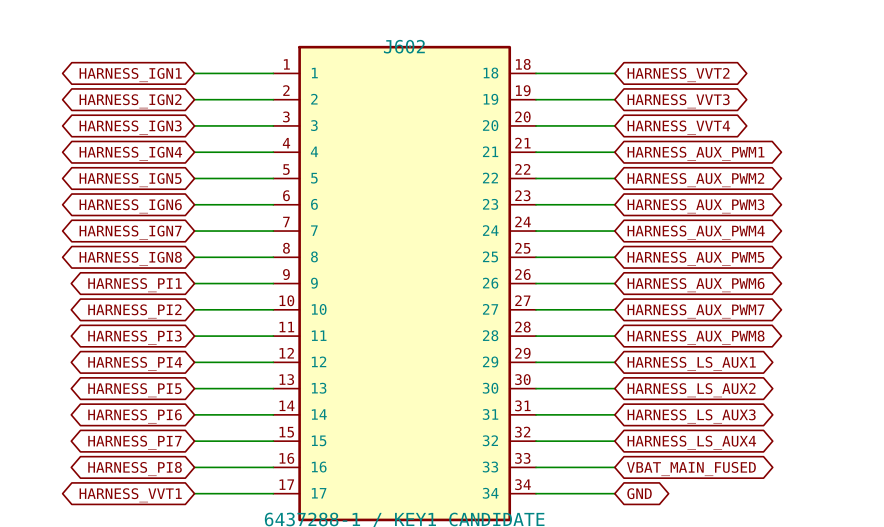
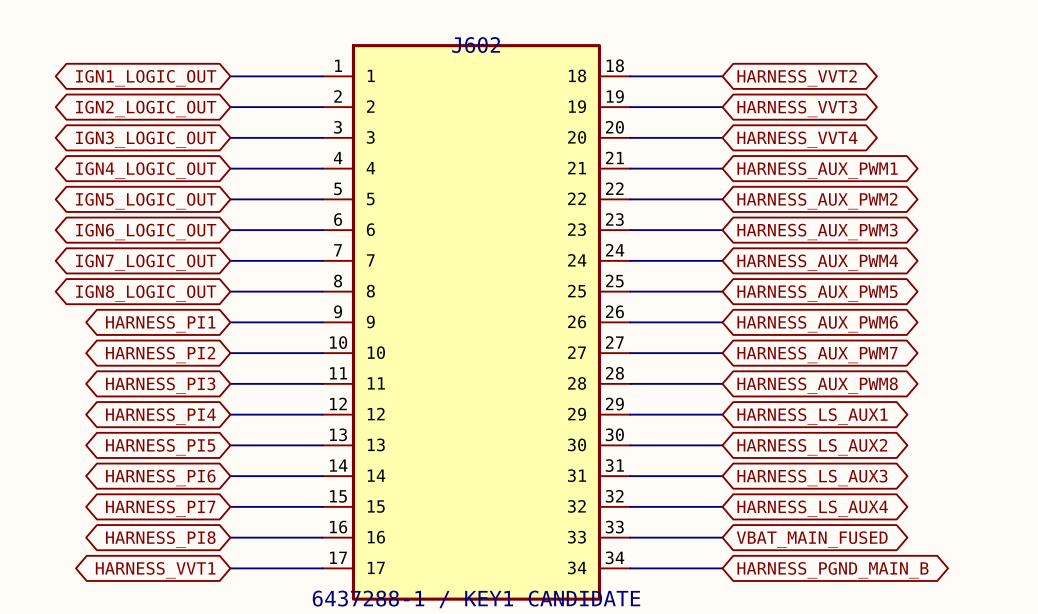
global label: HARNESS_IGN1 (130, 75) -> IGN1_LOGIC_OUT (146, 78)
global label: HARNESS_IGN2 (130, 101) -> IGN2_LOGIC_OUT (146, 108)
global label: HARNESS_IGN3 (130, 127) -> IGN3_LOGIC_OUT (146, 139)
global label: HARNESS_IGN4 (130, 153) -> IGN4_LOGIC_OUT (146, 170)
global label: HARNESS_IGN5 (130, 180) -> IGN5_LOGIC_OUT (146, 201)
global label: HARNESS_IGN6 (130, 206) -> IGN6_LOGIC_OUT (146, 232)
global label: HARNESS_IGN7 (130, 232) -> IGN7_LOGIC_OUT (146, 262)
global label: HARNESS_IGN8 (130, 258) -> IGN8_LOGIC_OUT (146, 293)
global label: GND (639, 493) -> HARNESS_PGND_MAIN_B (832, 570)

